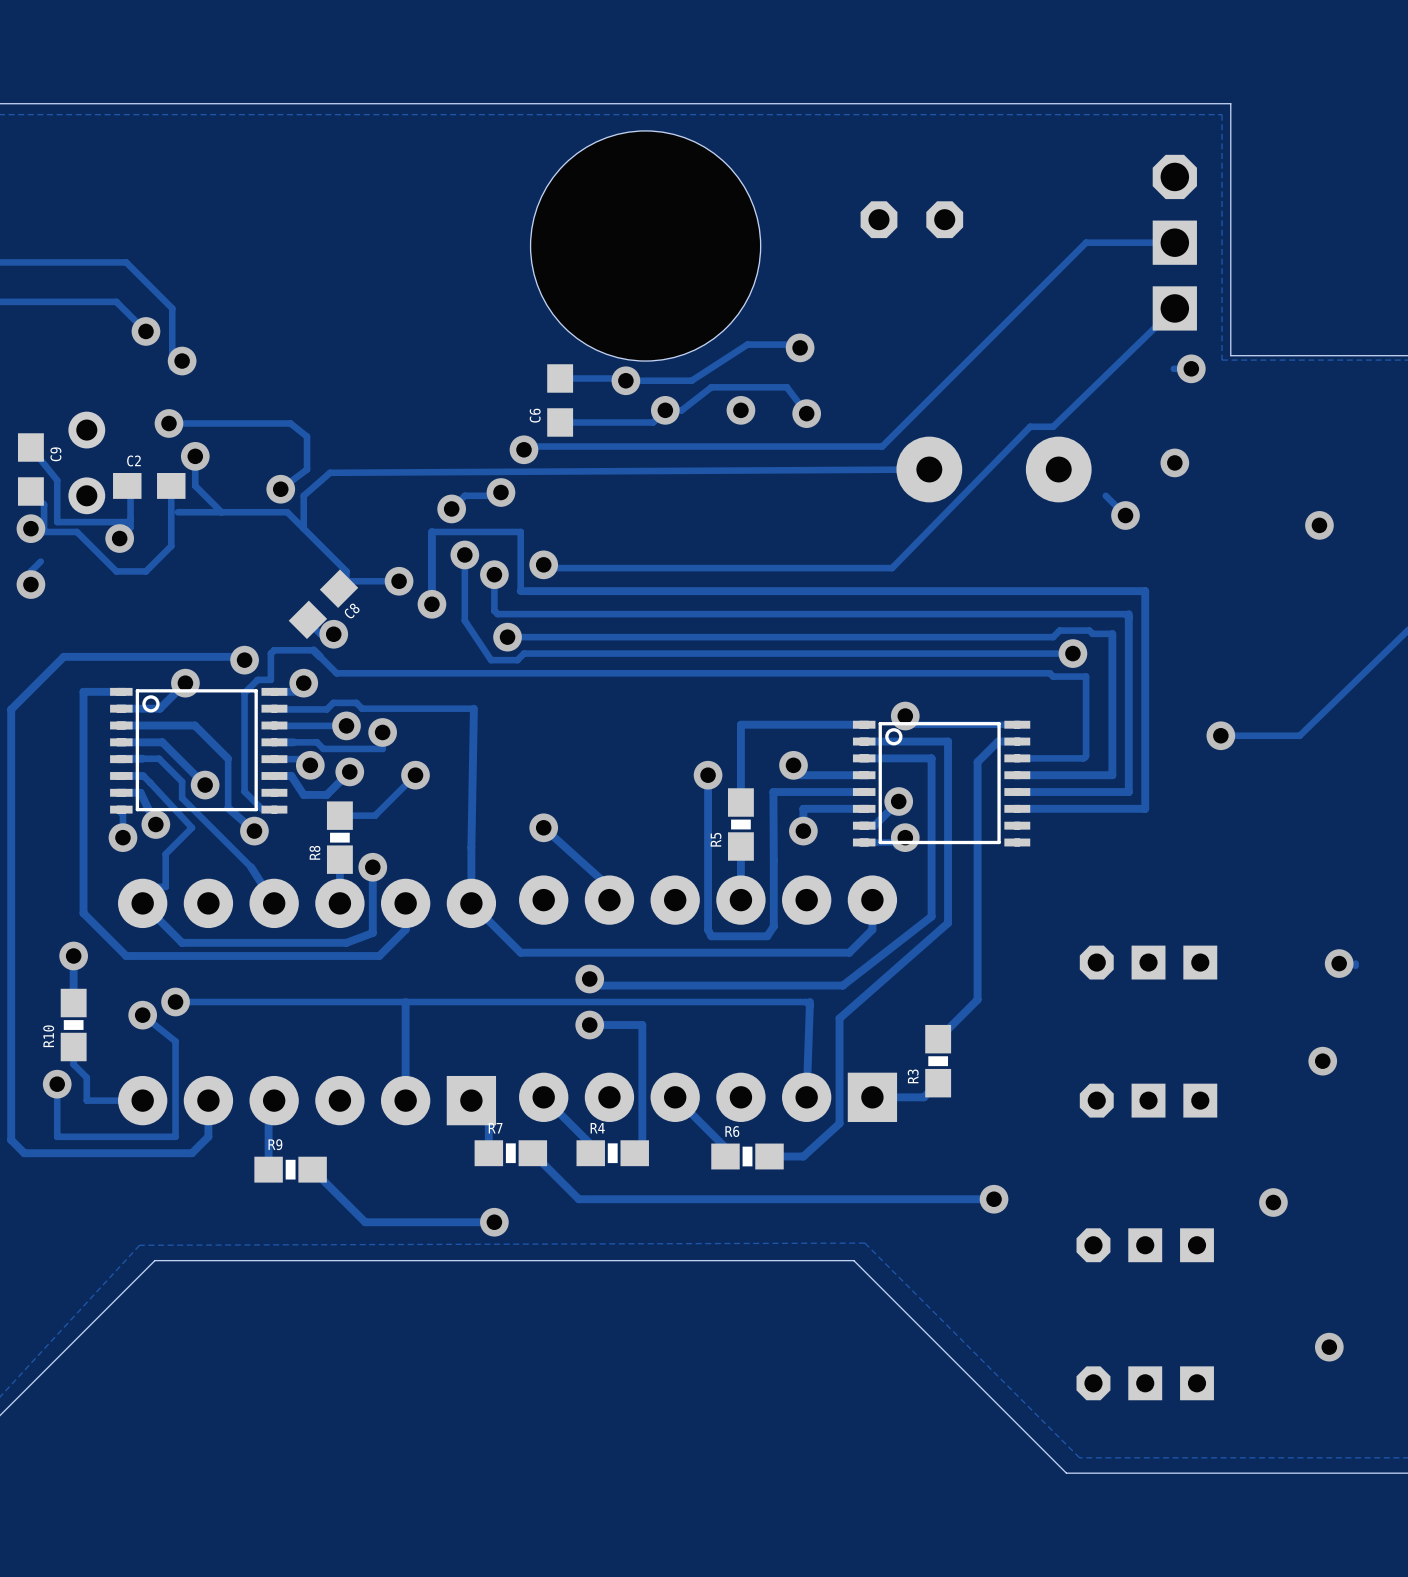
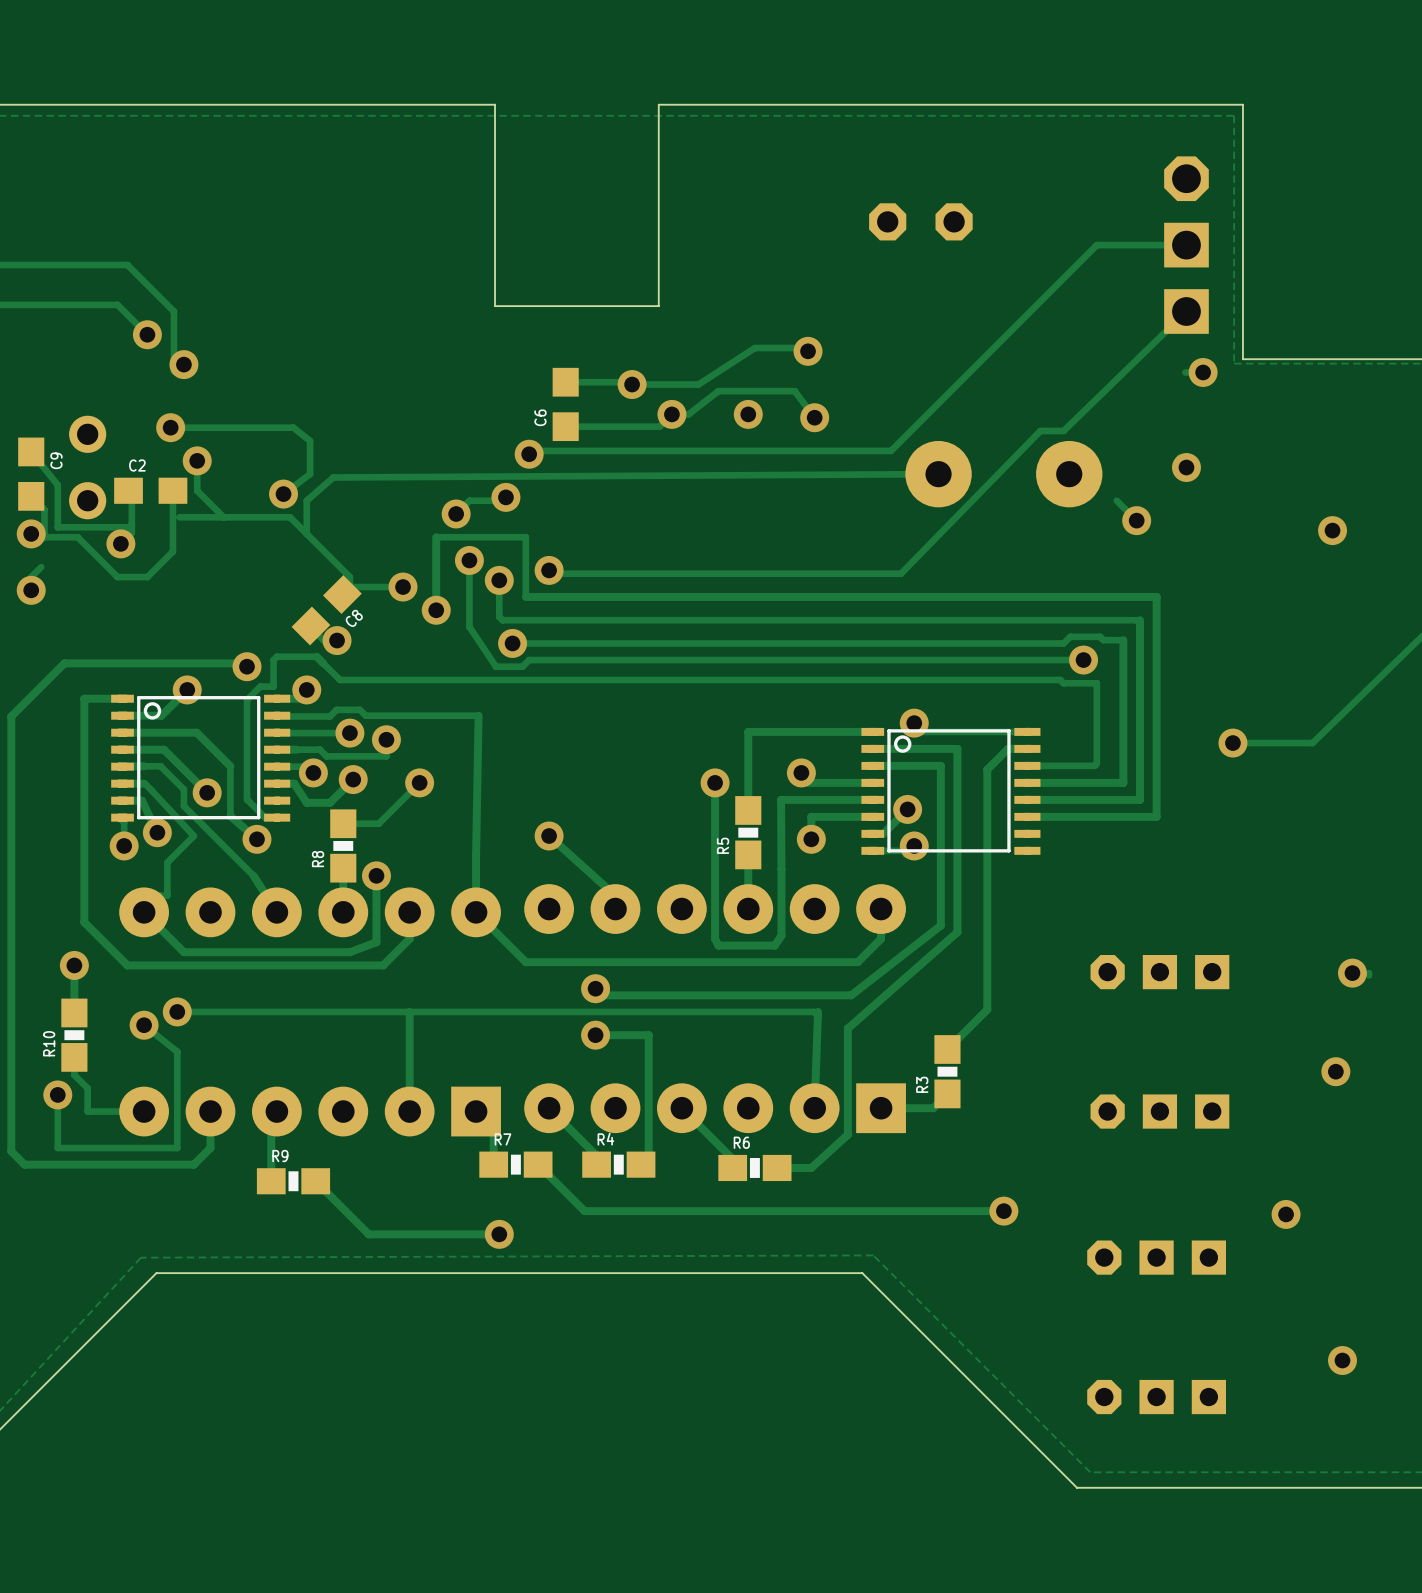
board edge: (652, 103) (490, 103) -> (658, 104) (658, 306) (495, 306) (495, 104)
hole: (645, 245) -> none

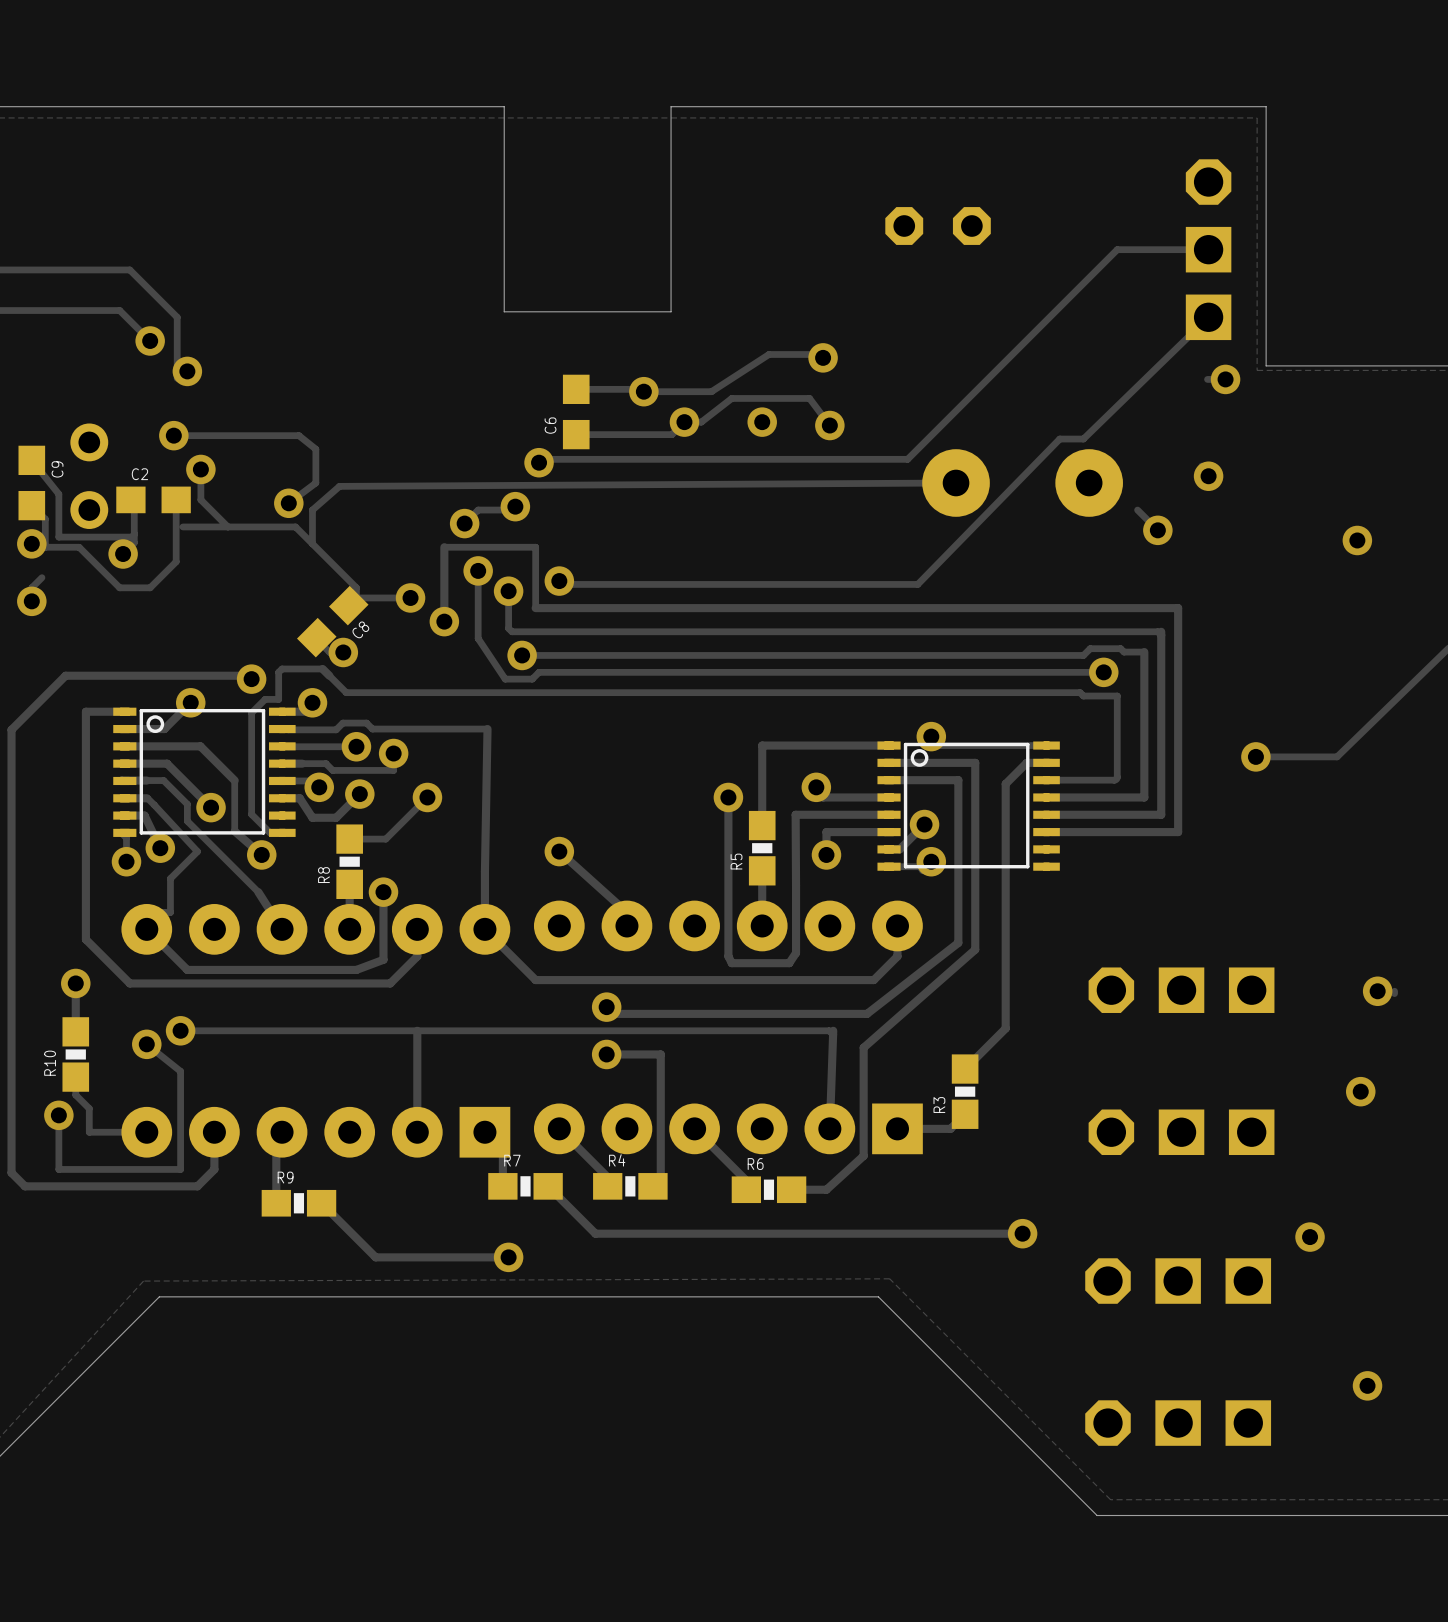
part footprint: [1090, 954, 1230, 990] -> [1088, 967, 1275, 1013]
part footprint: [1090, 1094, 1230, 1129] -> [1088, 1109, 1275, 1156]
part footprint: [1087, 1240, 1226, 1275] -> [1085, 1258, 1272, 1304]
part footprint: [1087, 1379, 1226, 1415] -> [1085, 1400, 1272, 1446]

